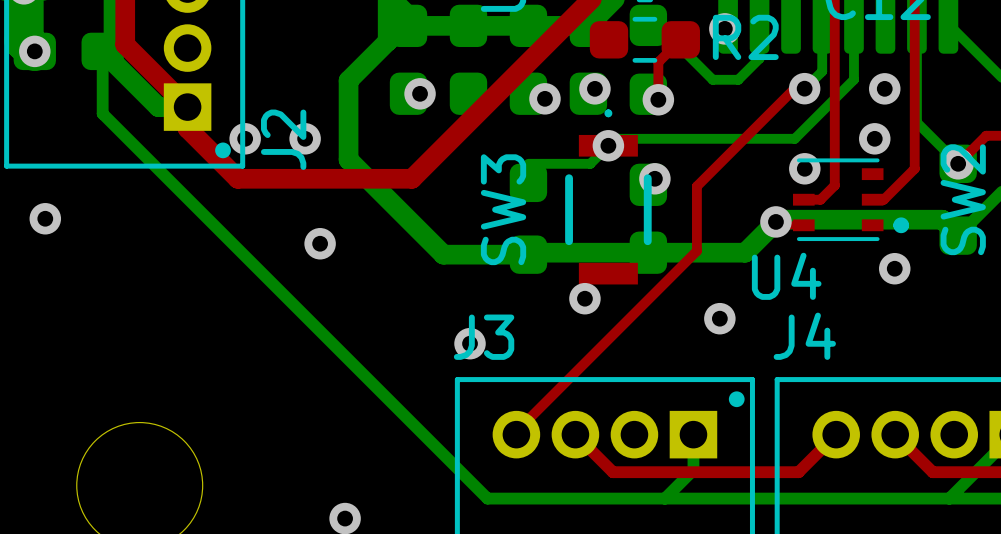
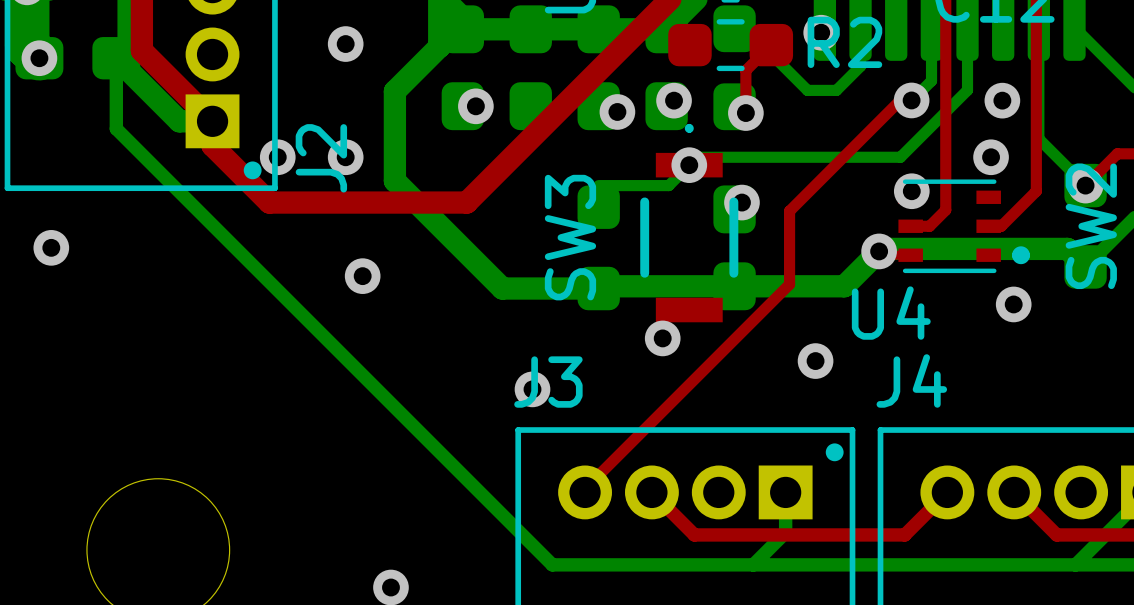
via: none -> (345, 44)

